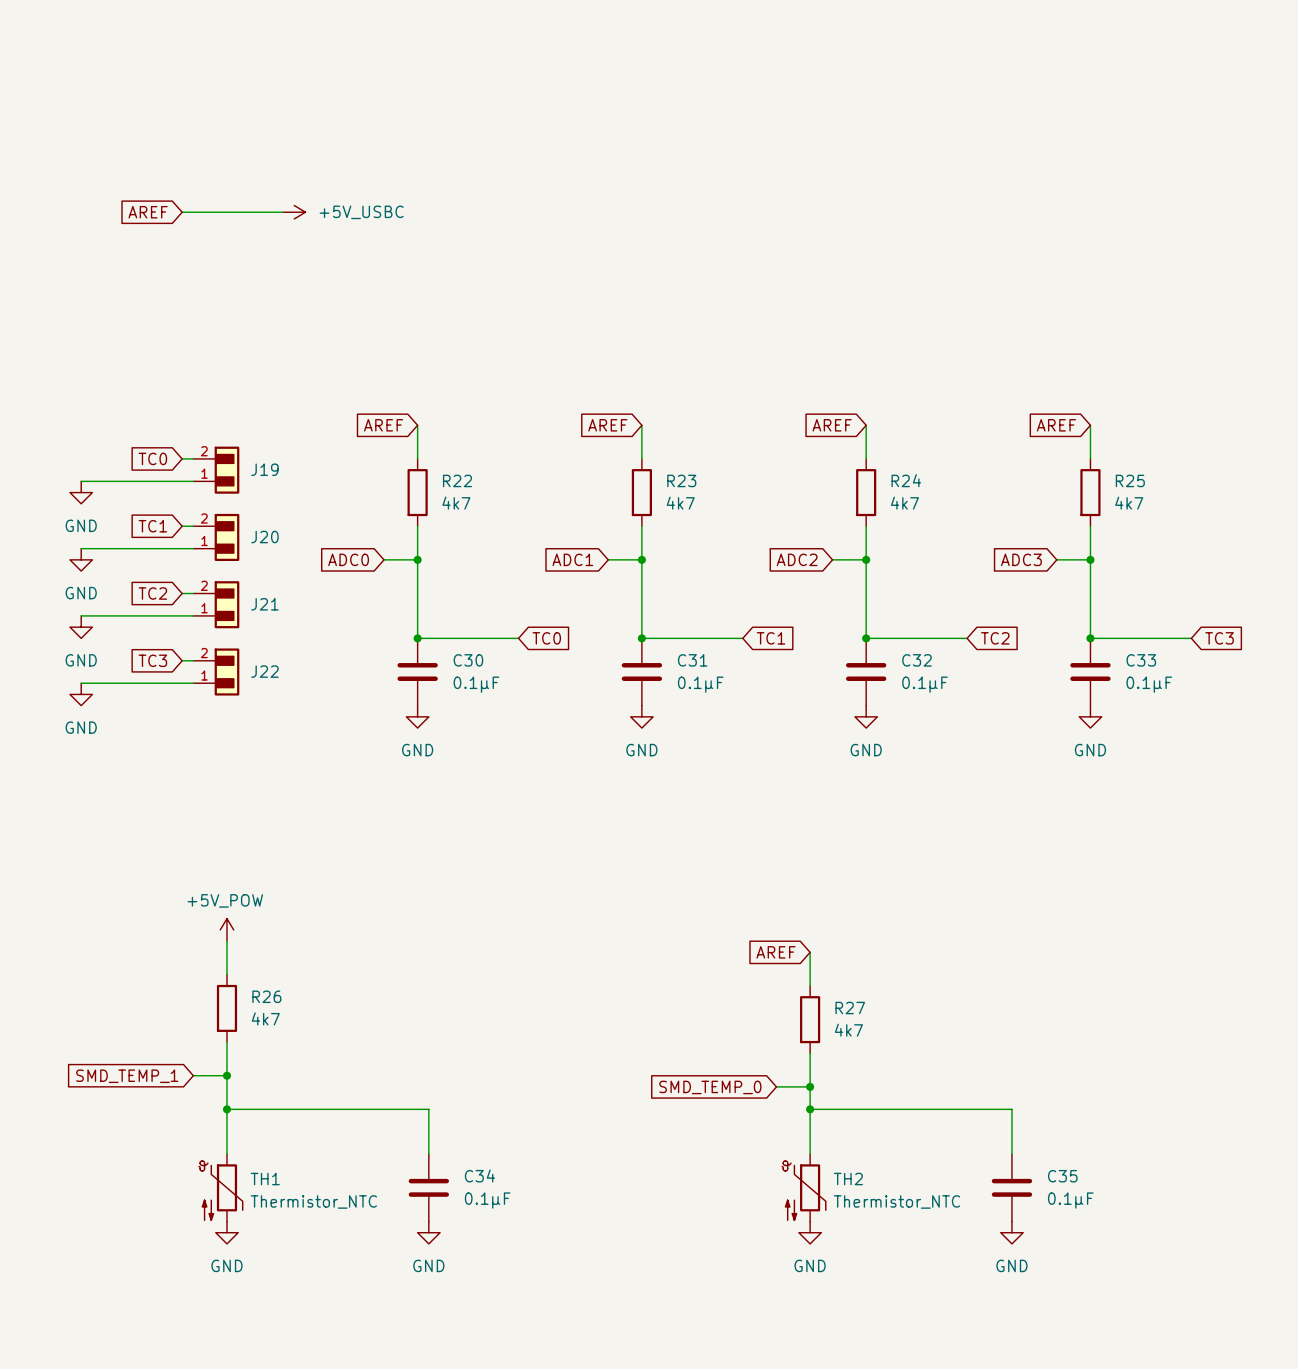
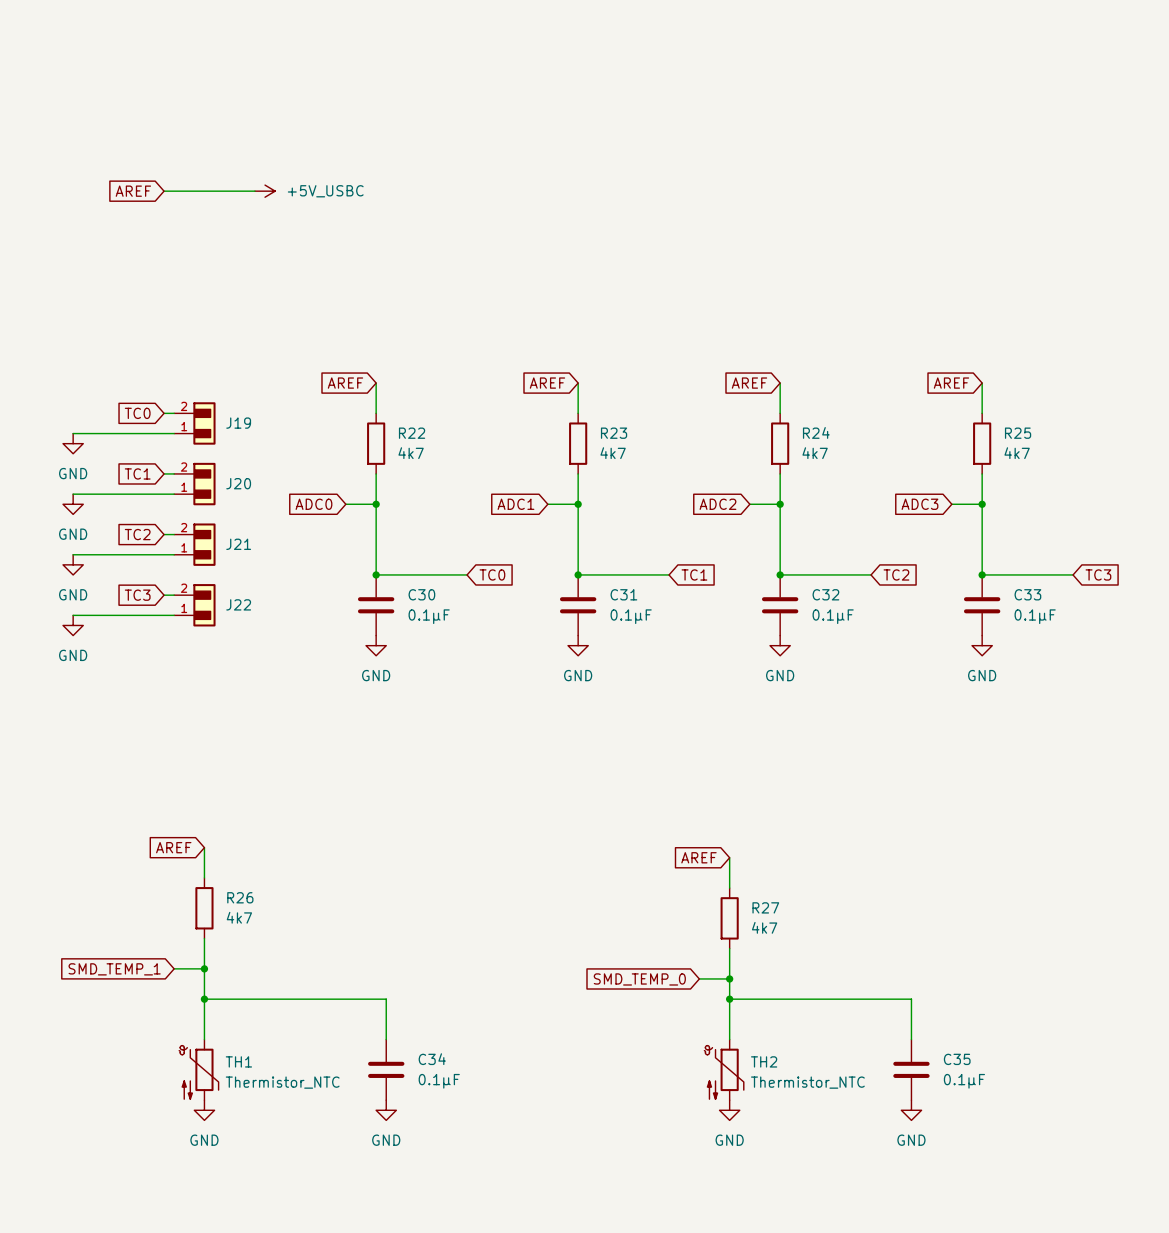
power symbol: +5V_POW (226, 929) -> none
global label: none -> AREF (173, 847)

